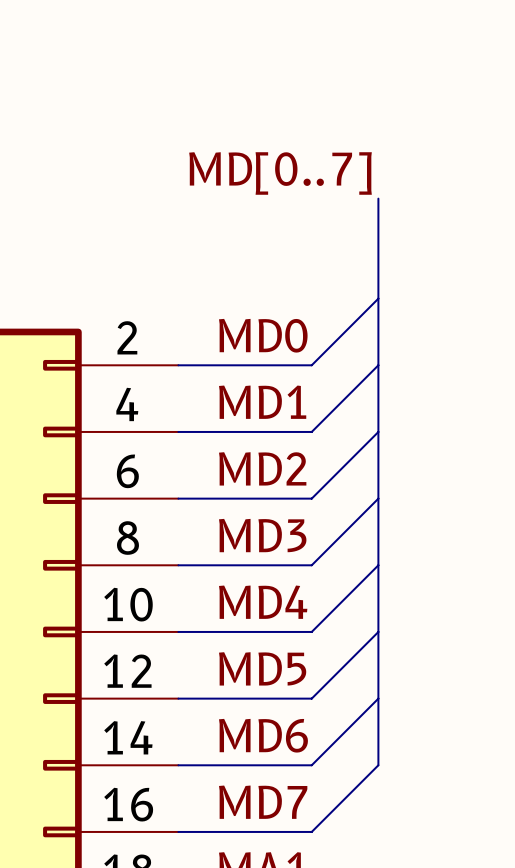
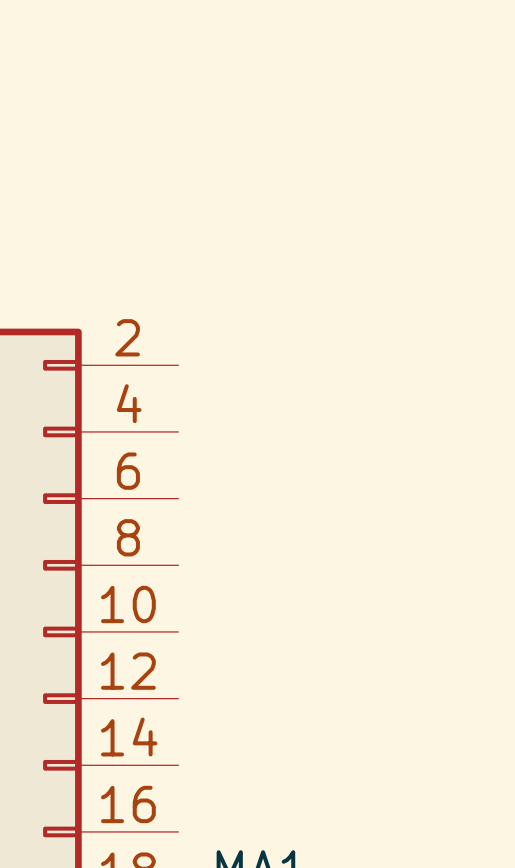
label: MD[0..7] (280, 173) -> none
bus: (378, 198) (378, 765) -> none
wire: (378, 298) (311, 365) (178, 365) -> none
label: MD0 (263, 335) -> none
wire: (378, 365) (311, 431) (178, 431) -> none
label: MD1 (262, 402) -> none
wire: (378, 431) (311, 498) (178, 498) -> none
label: MD2 (262, 468) -> none
wire: (378, 498) (311, 565) (178, 565) -> none
label: MD3 (262, 535) -> none
wire: (378, 565) (311, 631) (178, 631) -> none
label: MD4 (263, 602) -> none
wire: (378, 631) (311, 698) (178, 698) -> none
label: MD5 (262, 668) -> none
wire: (378, 698) (311, 765) (178, 765) -> none
label: MD6 (263, 735) -> none
wire: (378, 765) (311, 831) (178, 831) -> none
label: MD7 (263, 802) -> none

